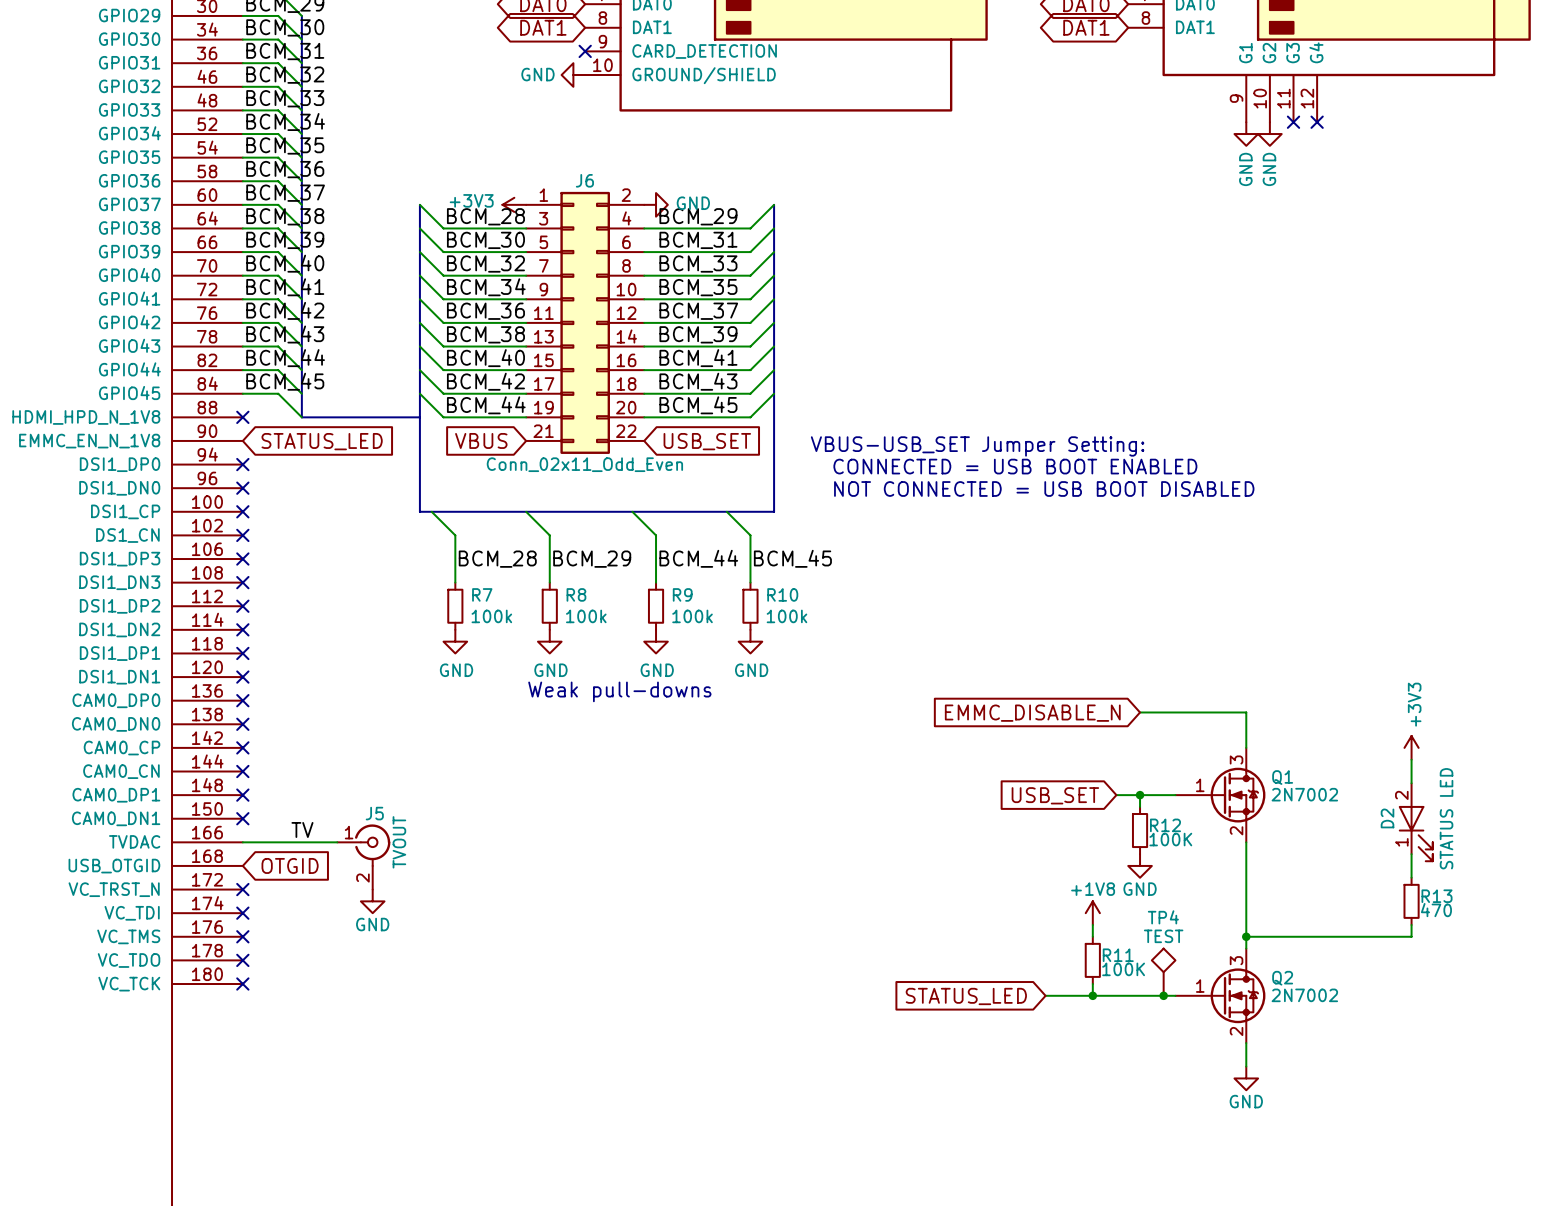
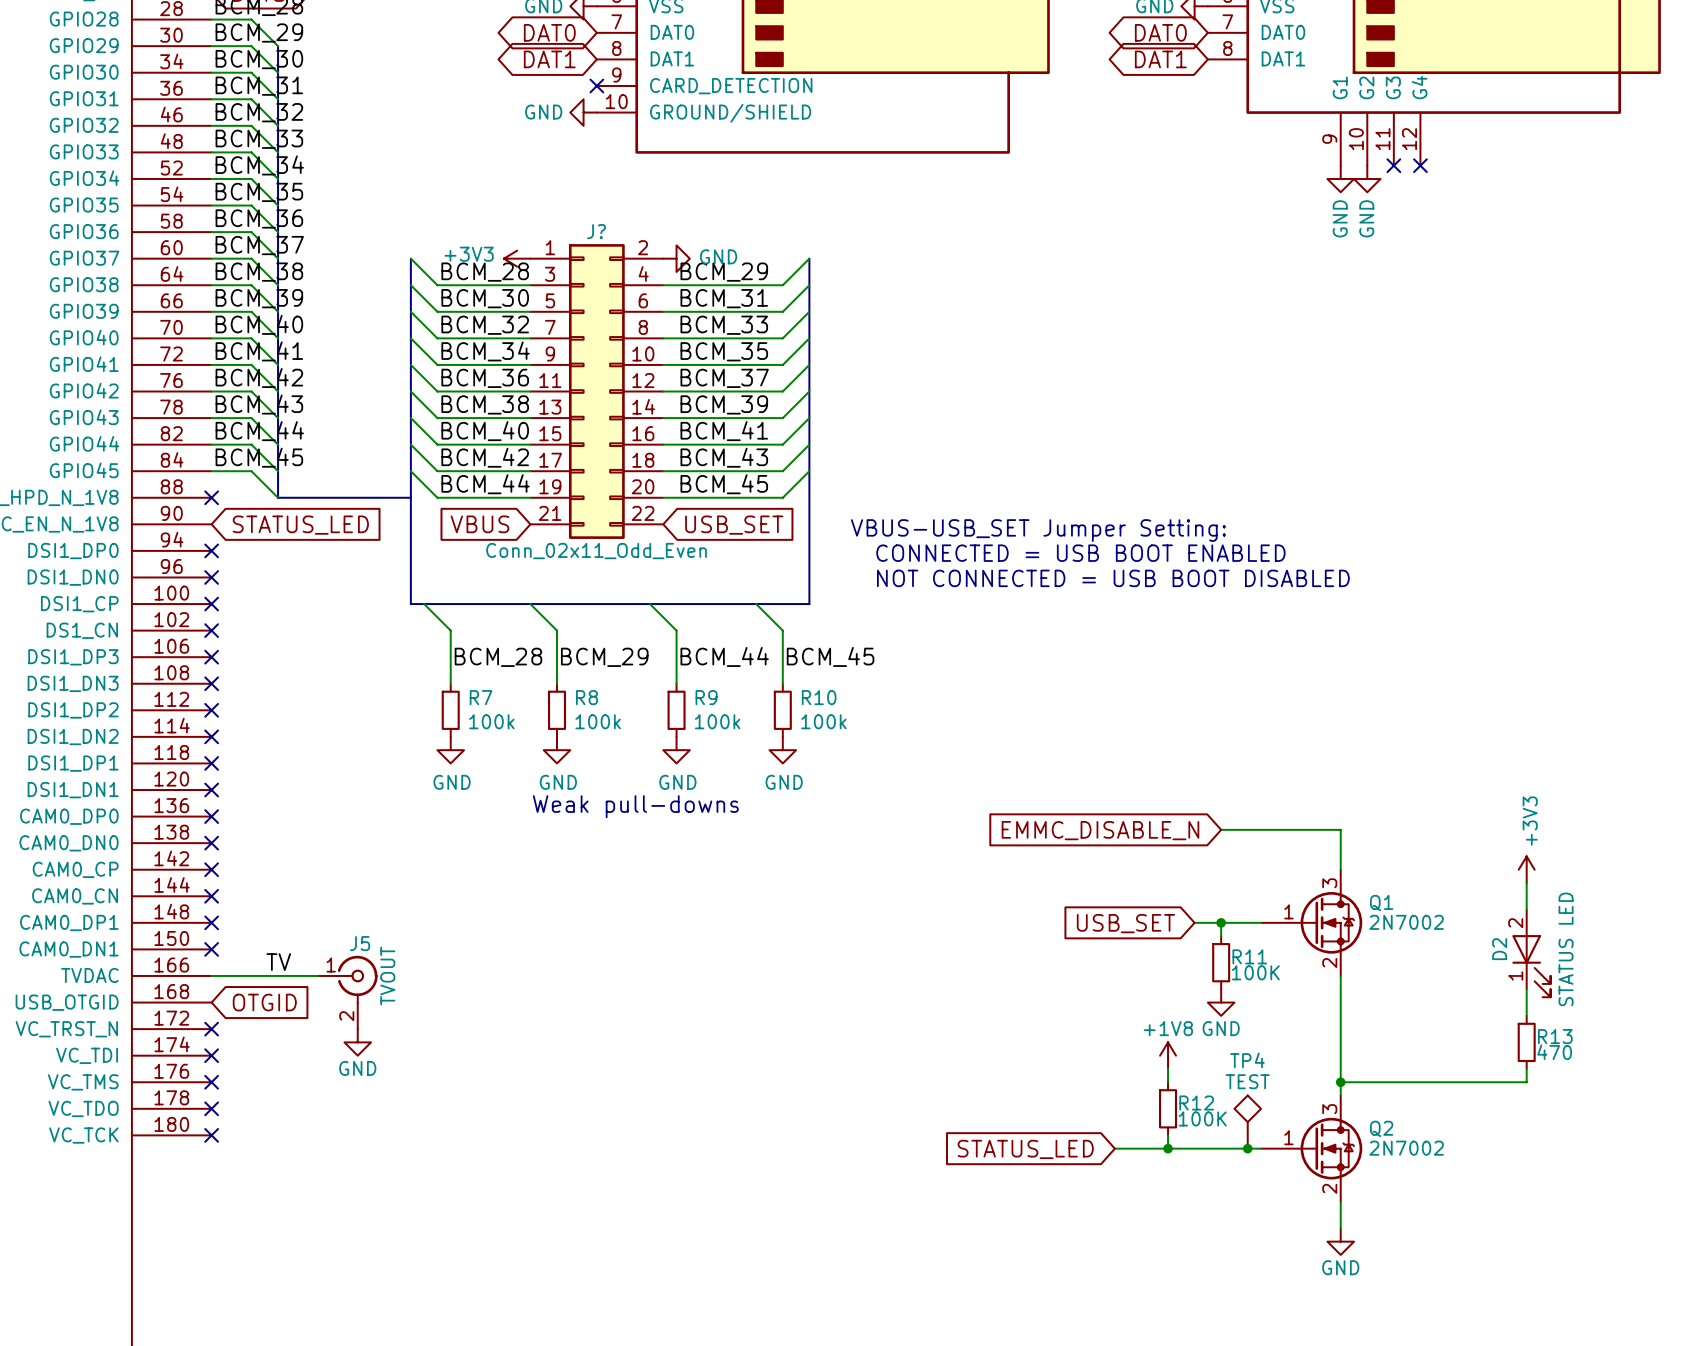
J6 name: J6 (584, 180) -> J? (596, 231)
R12 name: R12 (1165, 825) -> R11 (1249, 956)
R11 name: R11 (1118, 955) -> R12 (1196, 1103)

